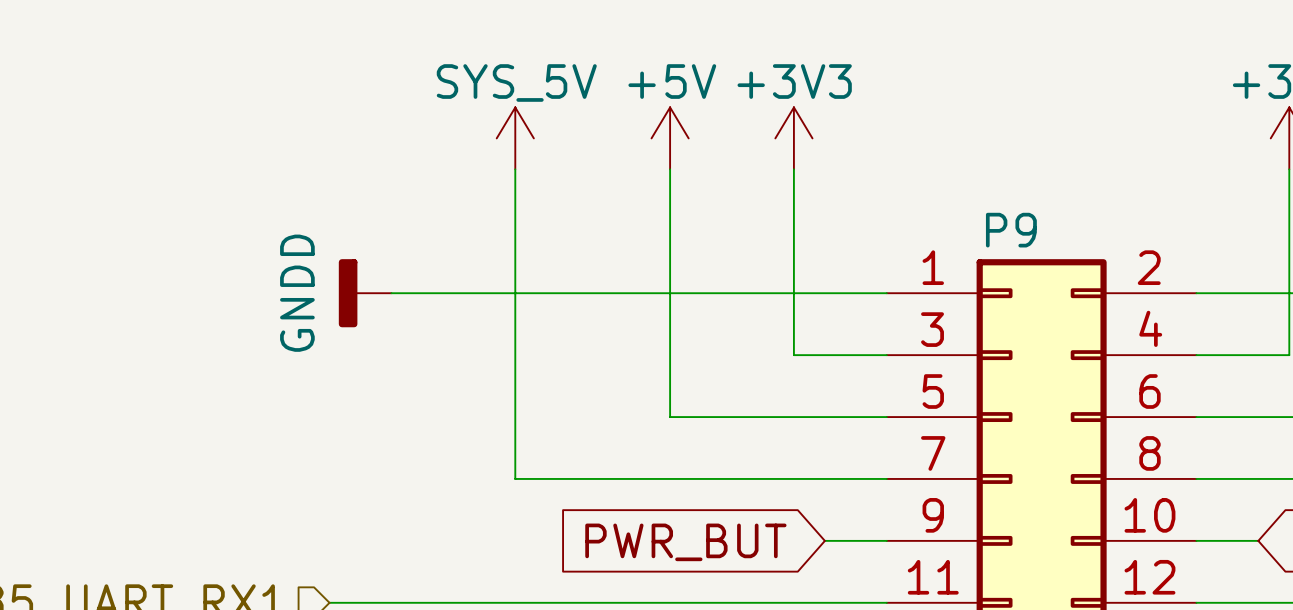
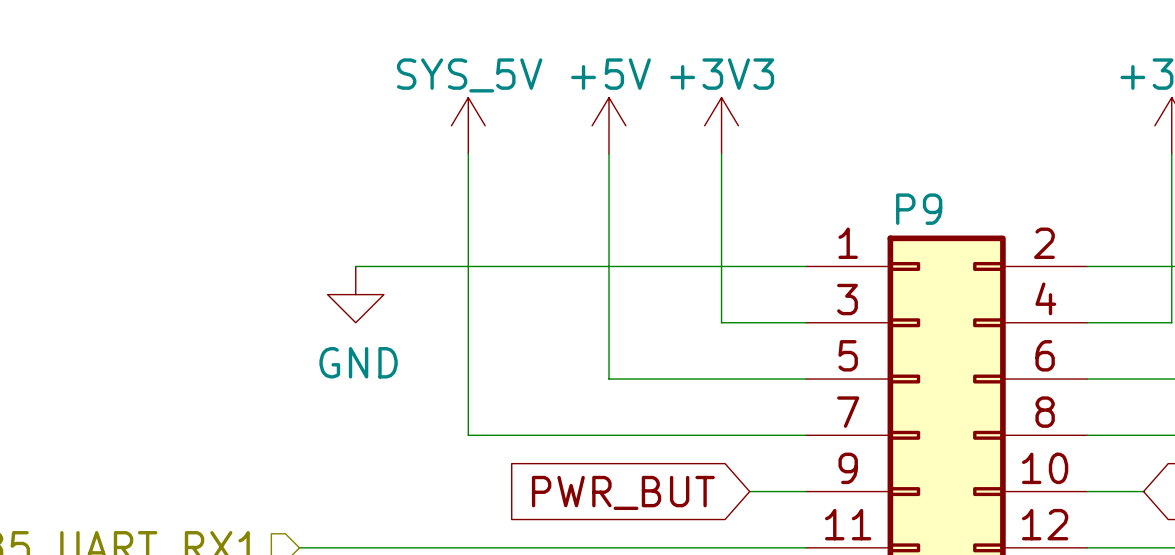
power symbol: GNDD (365, 293) -> none
power symbol: none -> GND (355, 294)

